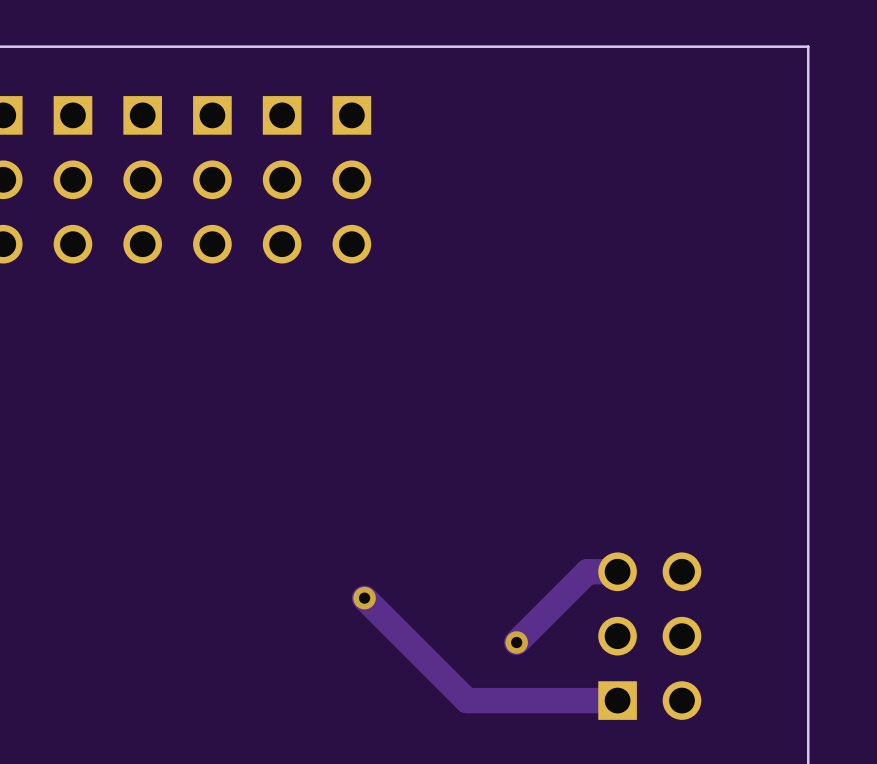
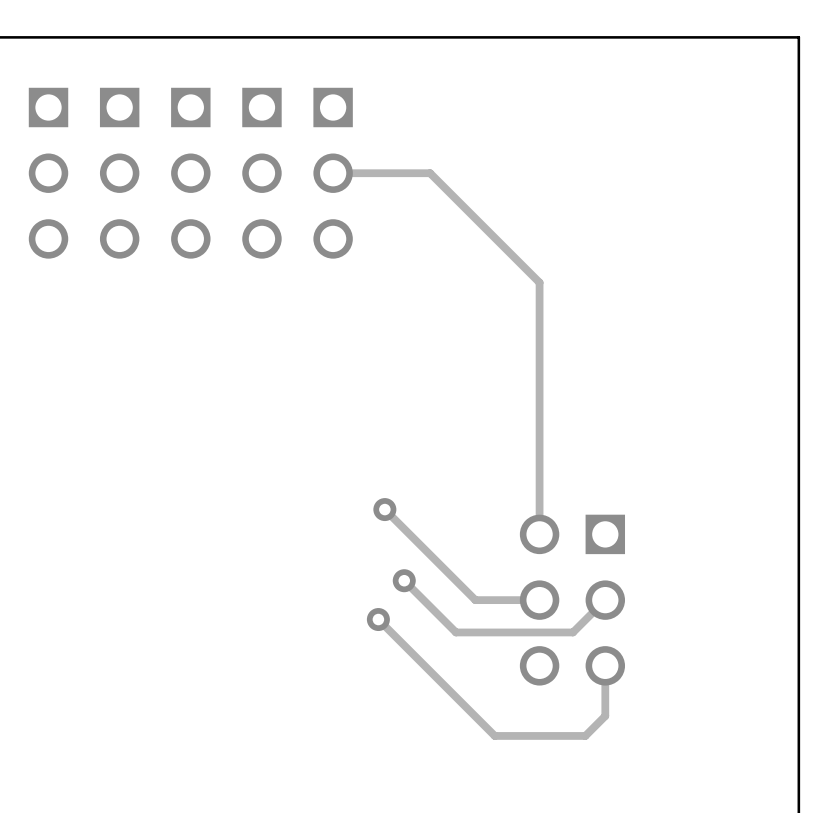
track: none -> (333, 173) (430, 173) (539, 282) (539, 534)
track: none -> (384, 509) (475, 600) (539, 600)
via: none -> (384, 509)
track: (617, 571) (587, 571) (516, 642) -> none
track: none -> (404, 580) (456, 632) (572, 632) (605, 600)
via: none -> (404, 580)
track: (364, 598) (466, 700) (617, 700) -> none
via: (364, 598) -> none
track: none -> (378, 619) (494, 735) (585, 735) (605, 716) (605, 665)
via: none -> (378, 619)
part rotation: 0° (649, 636) -> 180° (572, 600)
via: (516, 642) -> none

